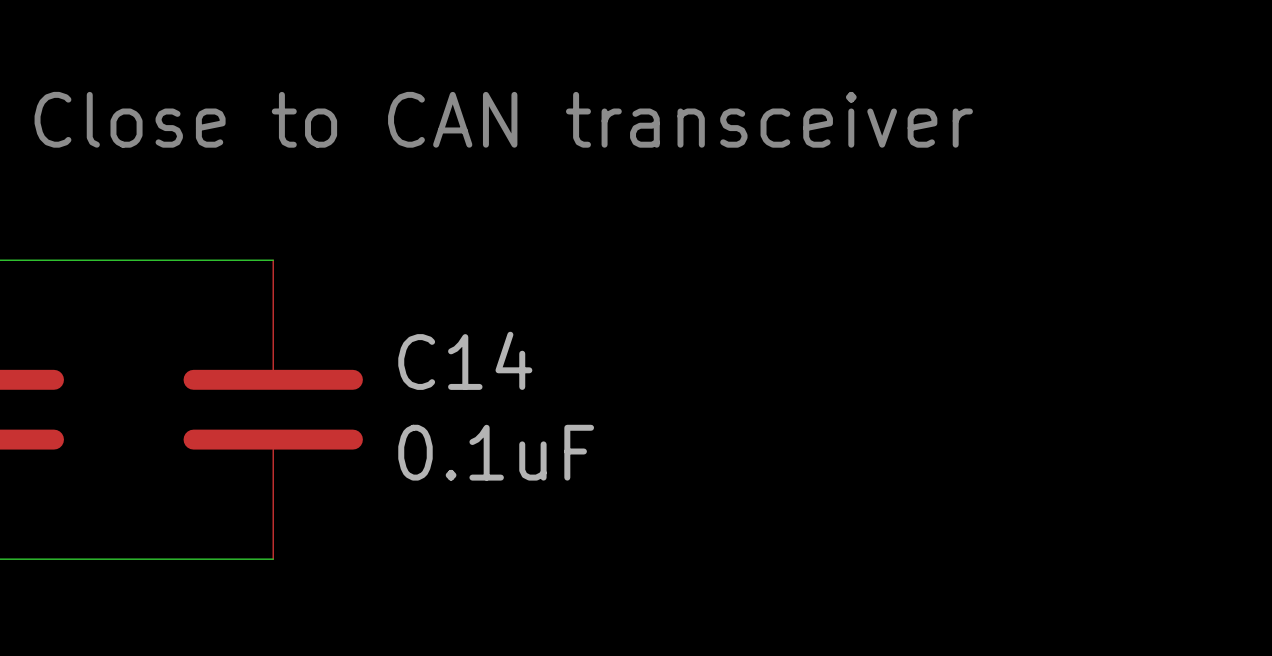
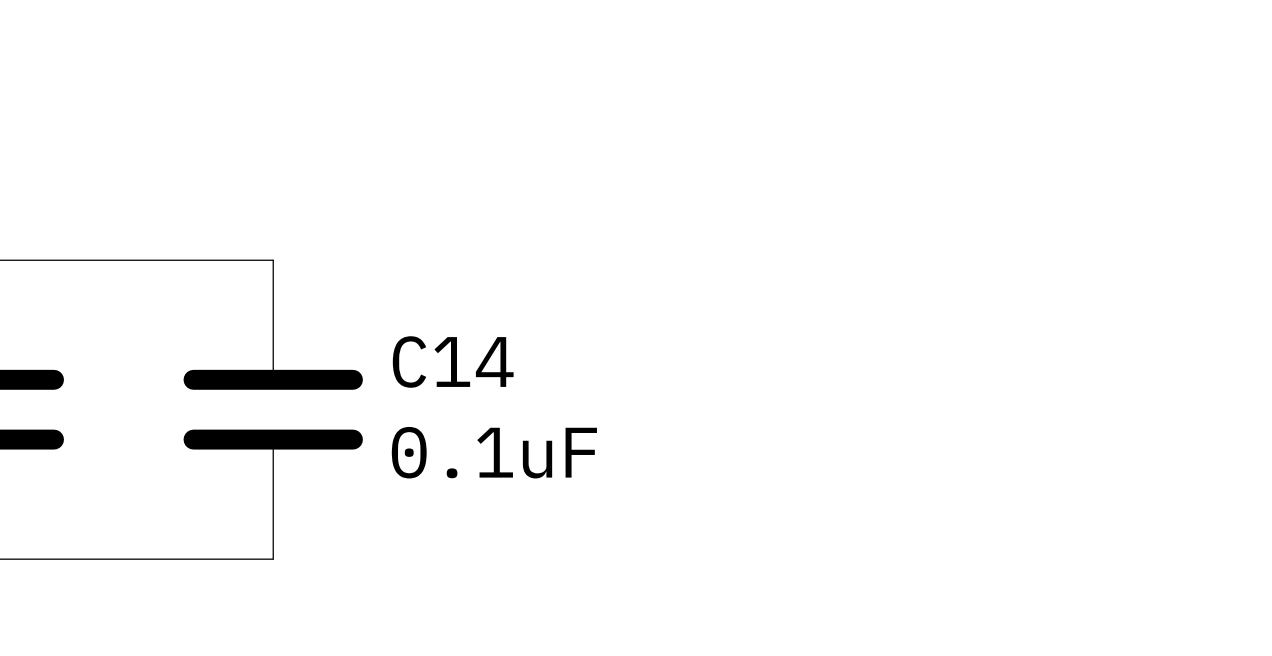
text: Close to CAN transceiver (503, 119) -> none

